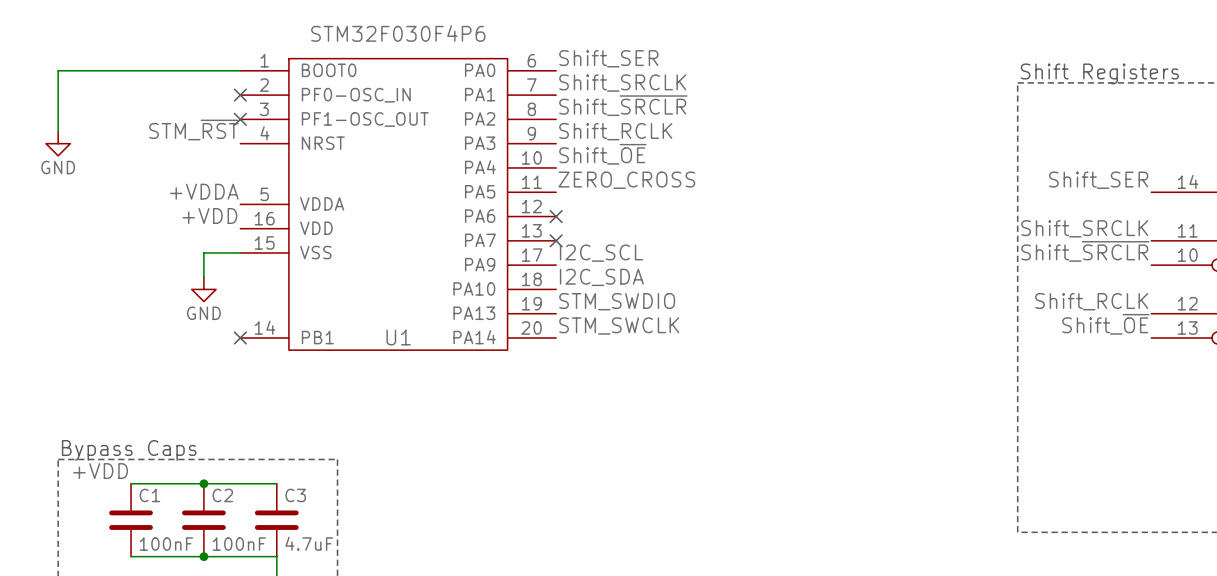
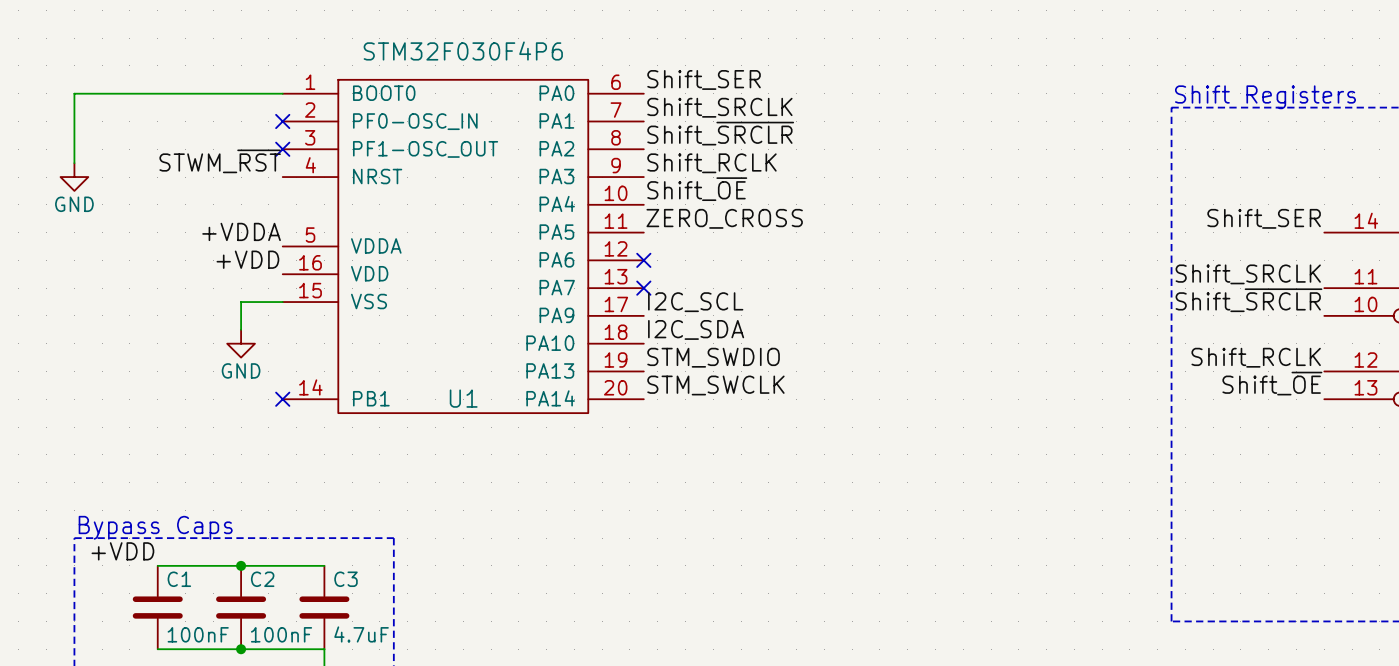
label: STM_~{RST} (193, 129) -> STWM_~{RST} (220, 161)

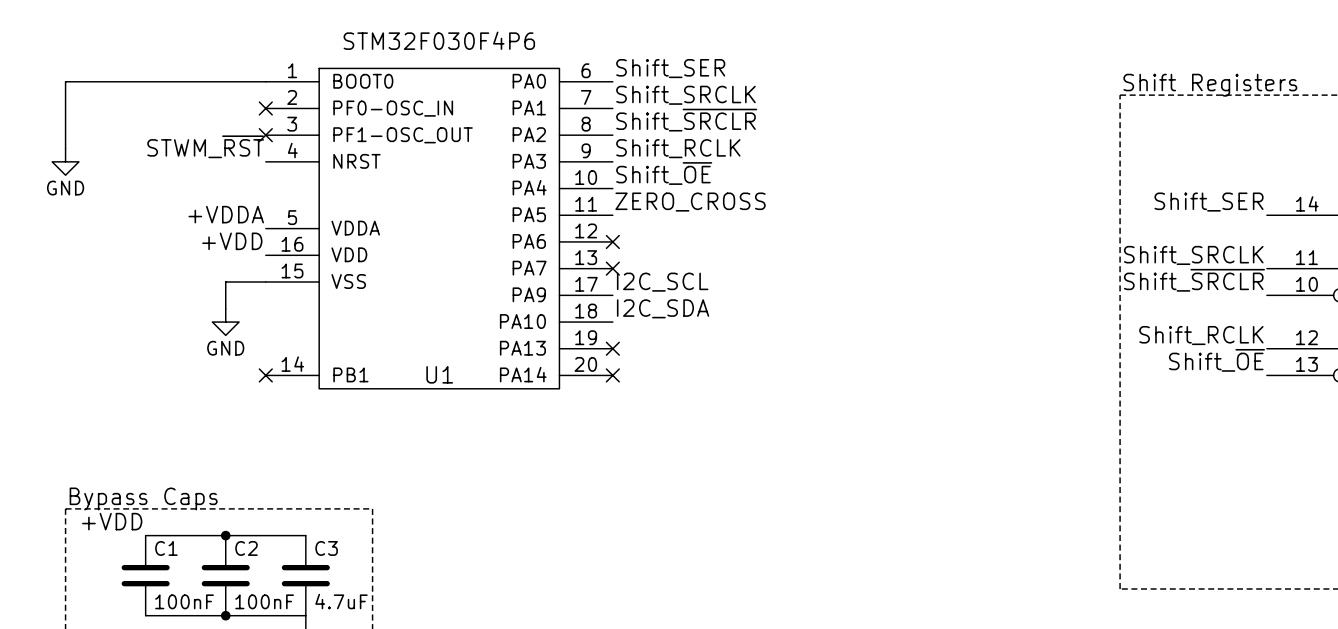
label: STM_SWDIO (713, 357) -> none
no-connect mark: none -> (612, 348)
label: STM_SWCLK (715, 385) -> none
no-connect mark: none -> (612, 375)

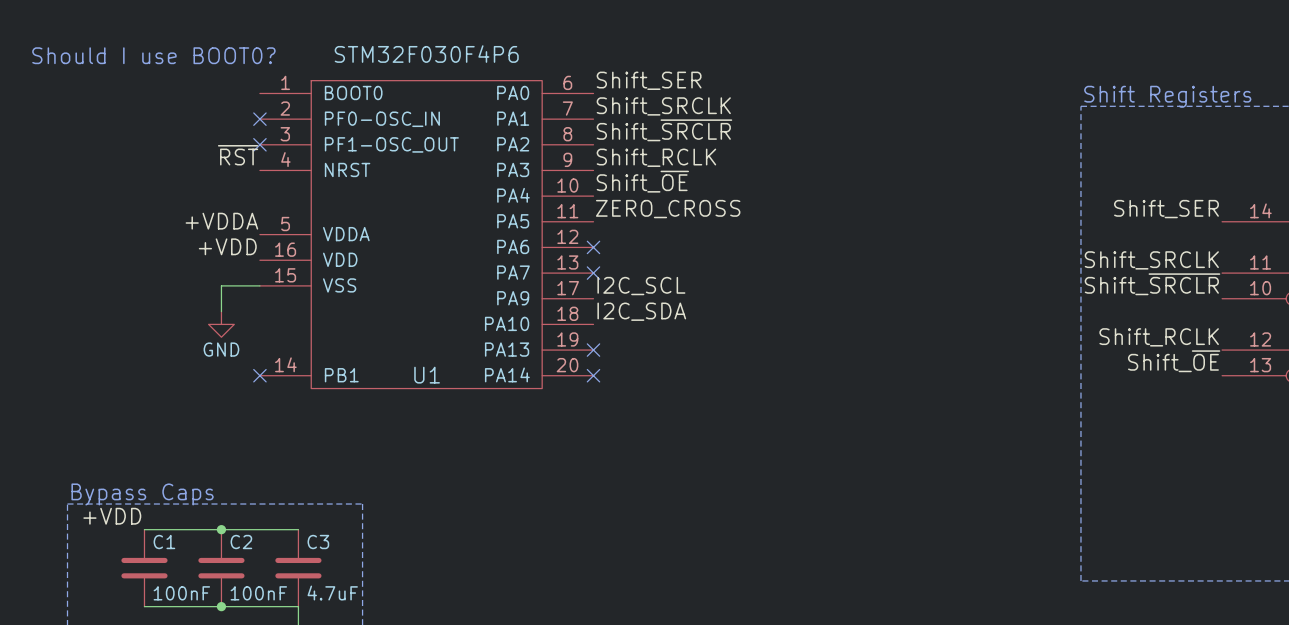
text: none -> Should I use BOOT0? (153, 55)
wire: (265, 81) (65, 81) (65, 148) -> none
label: STWM_~{RST} (205, 146) -> ~{RST} (238, 155)
power symbol: GND (65, 161) -> none

